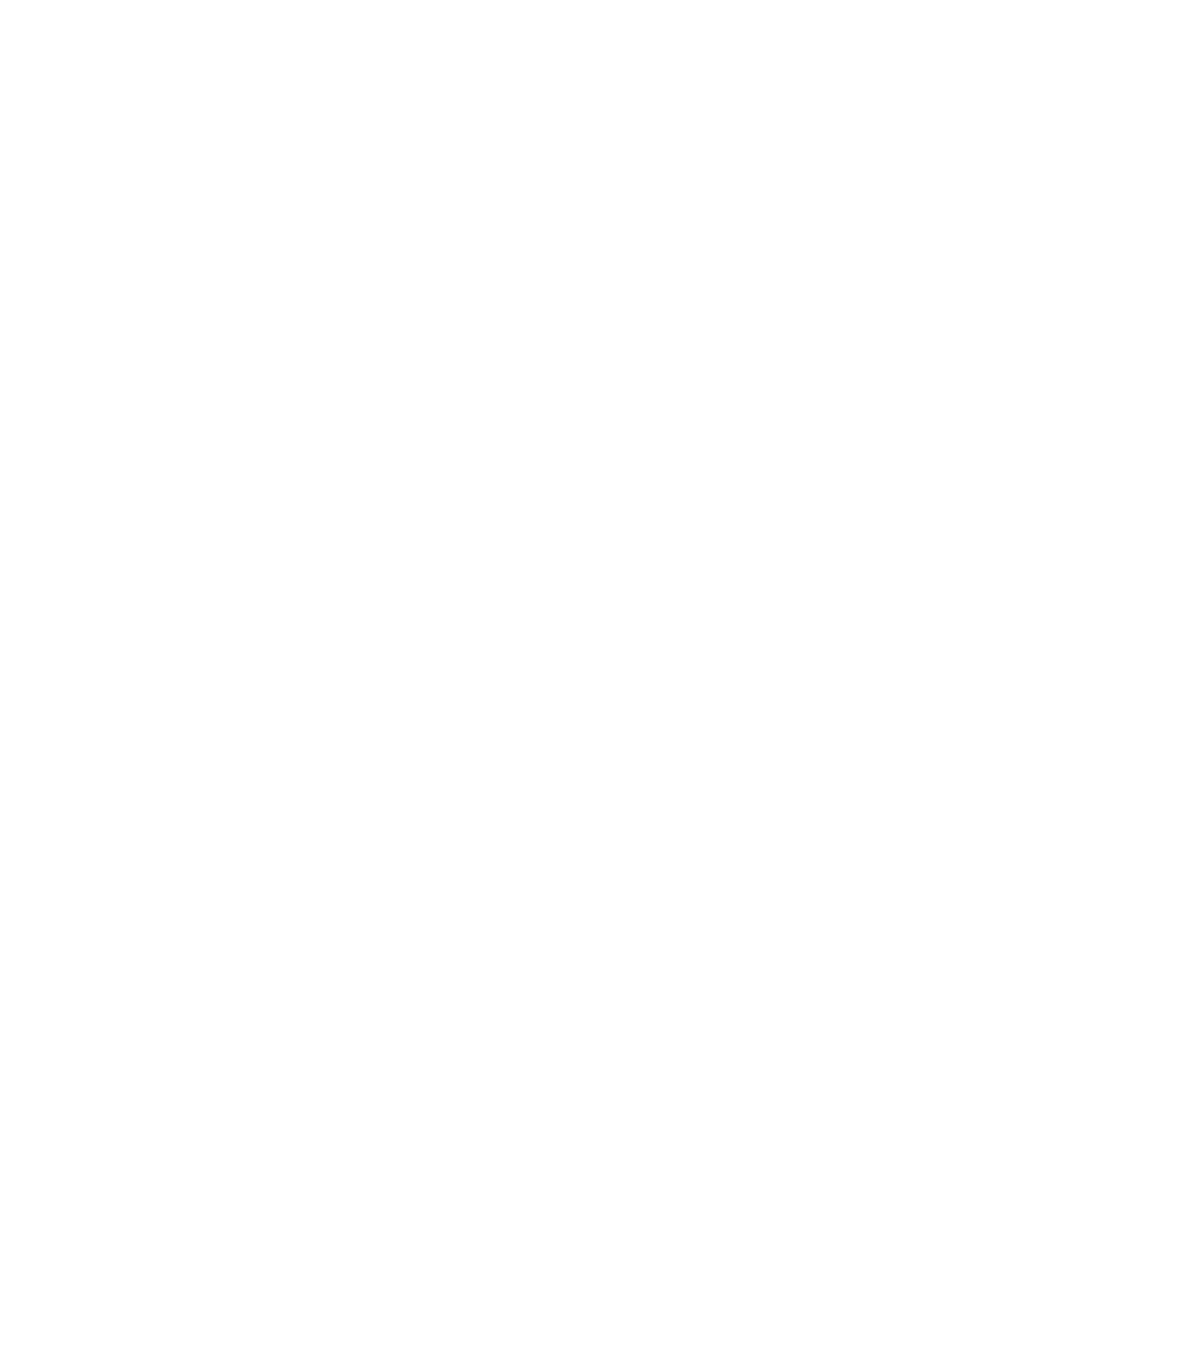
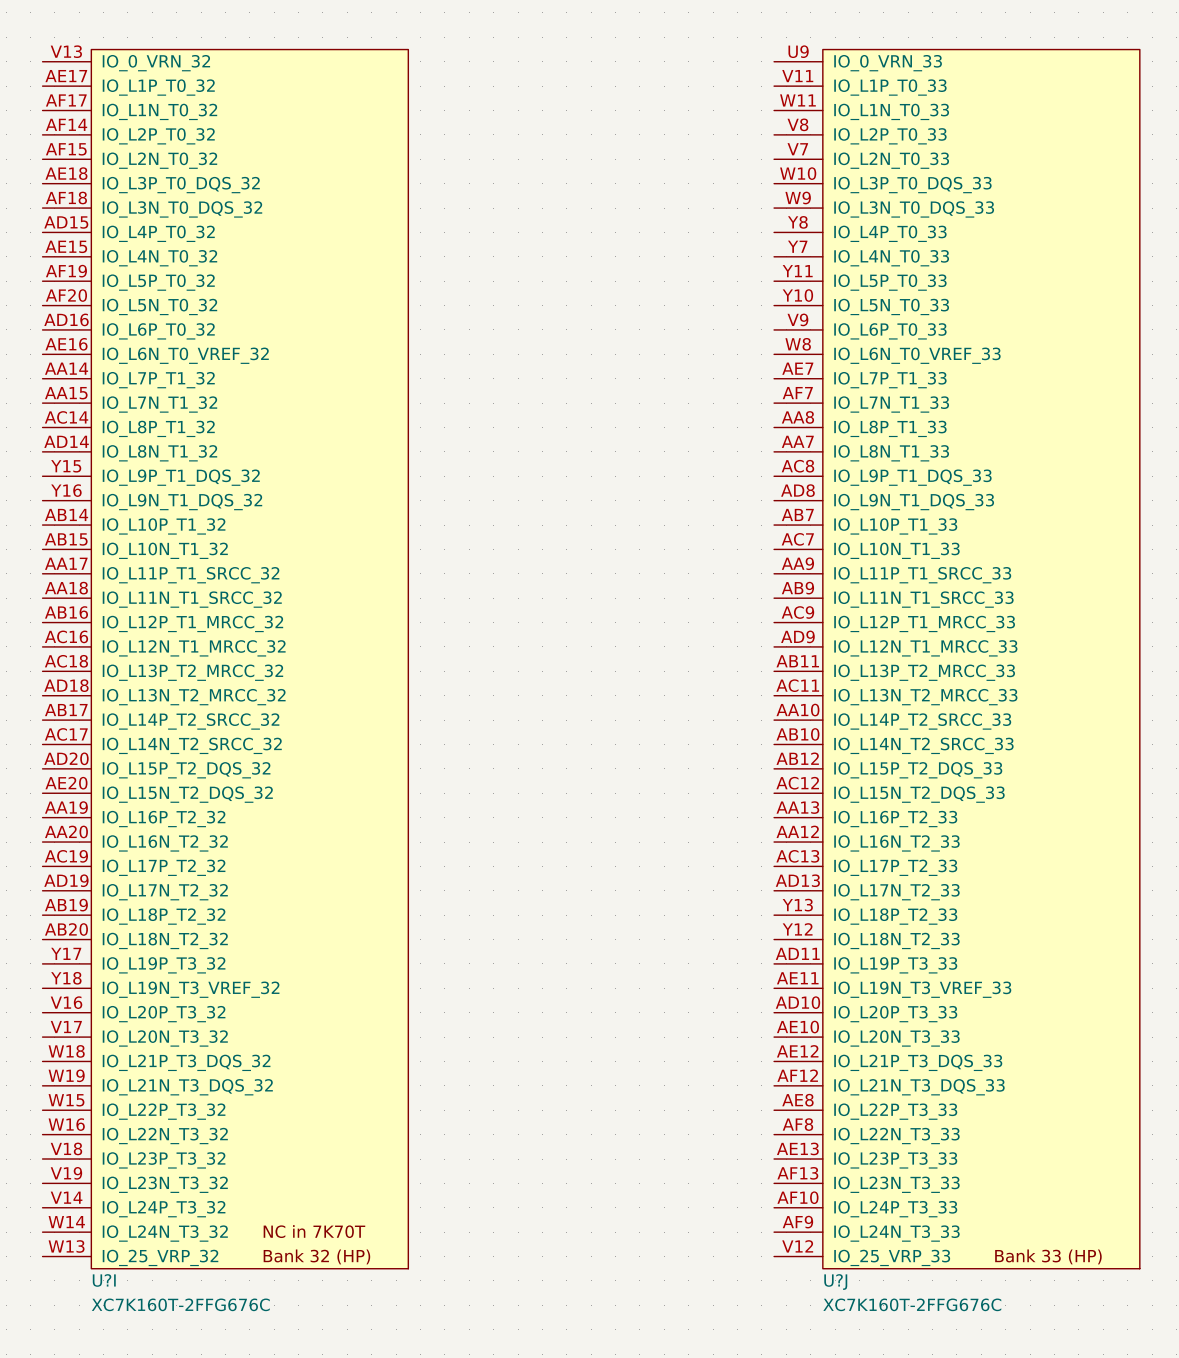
U?I: none -> XC7K160T-2FFG676C (225, 659)
U?J: none -> XC7K160T-2FFG676C (956, 659)

